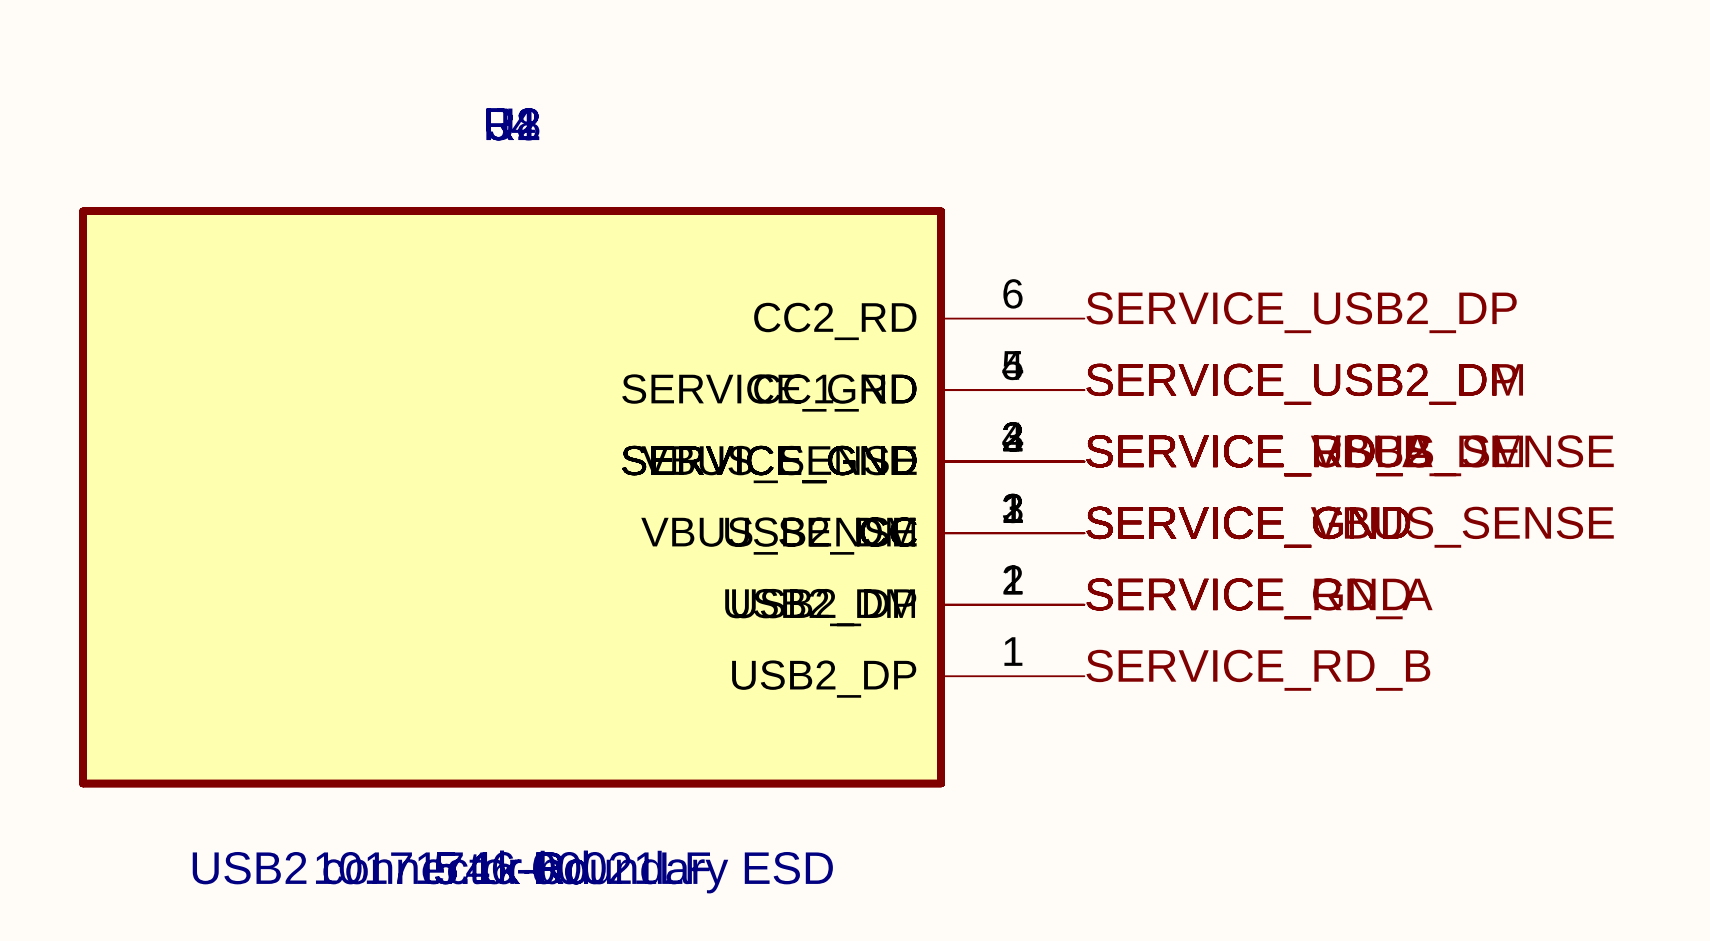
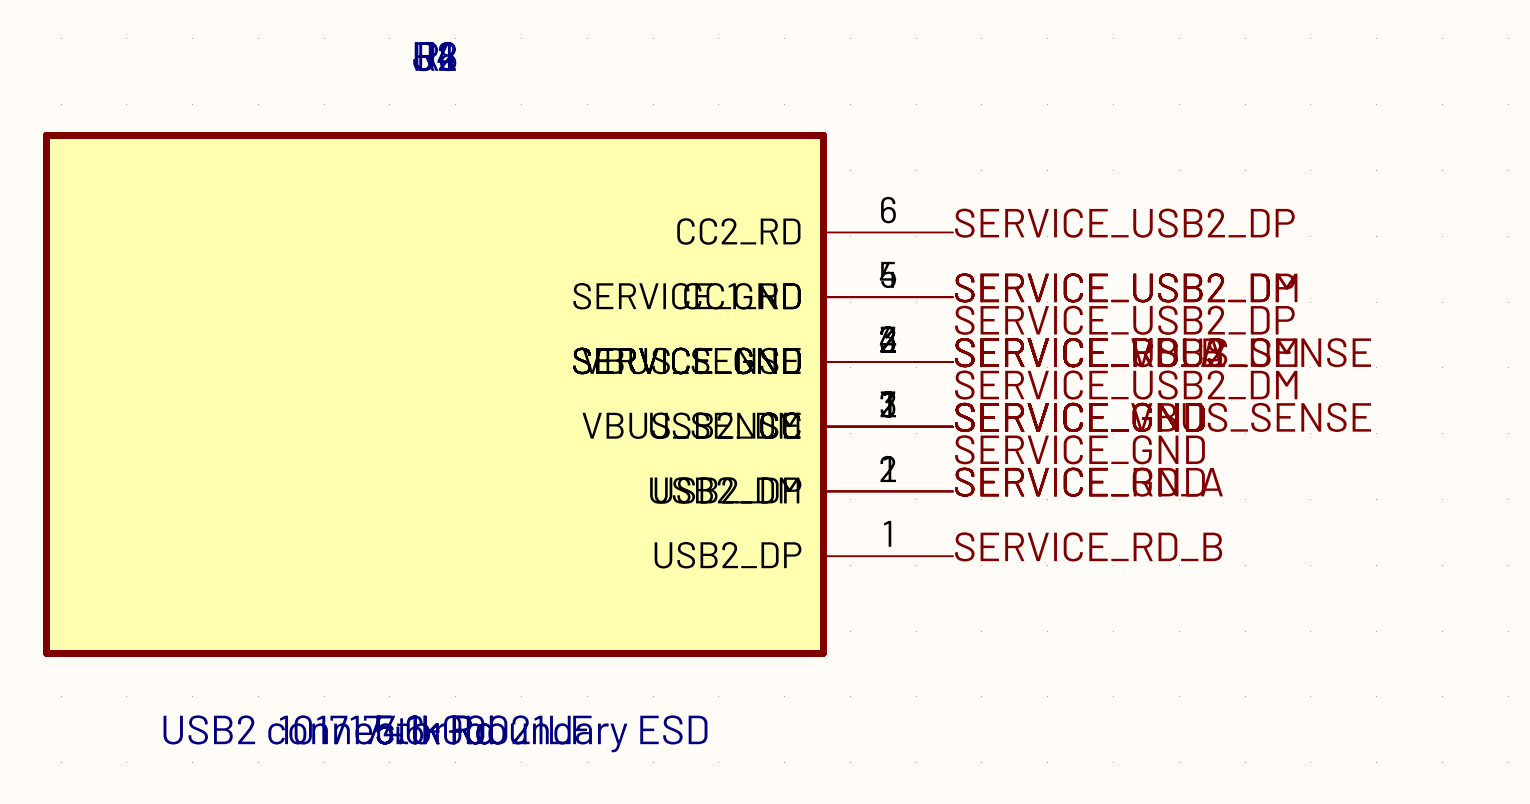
label: none -> SERVICE_USB2_DP (1124, 320)
label: none -> SERVICE_USB2_DM (1126, 385)
label: none -> SERVICE_GND (1079, 449)

